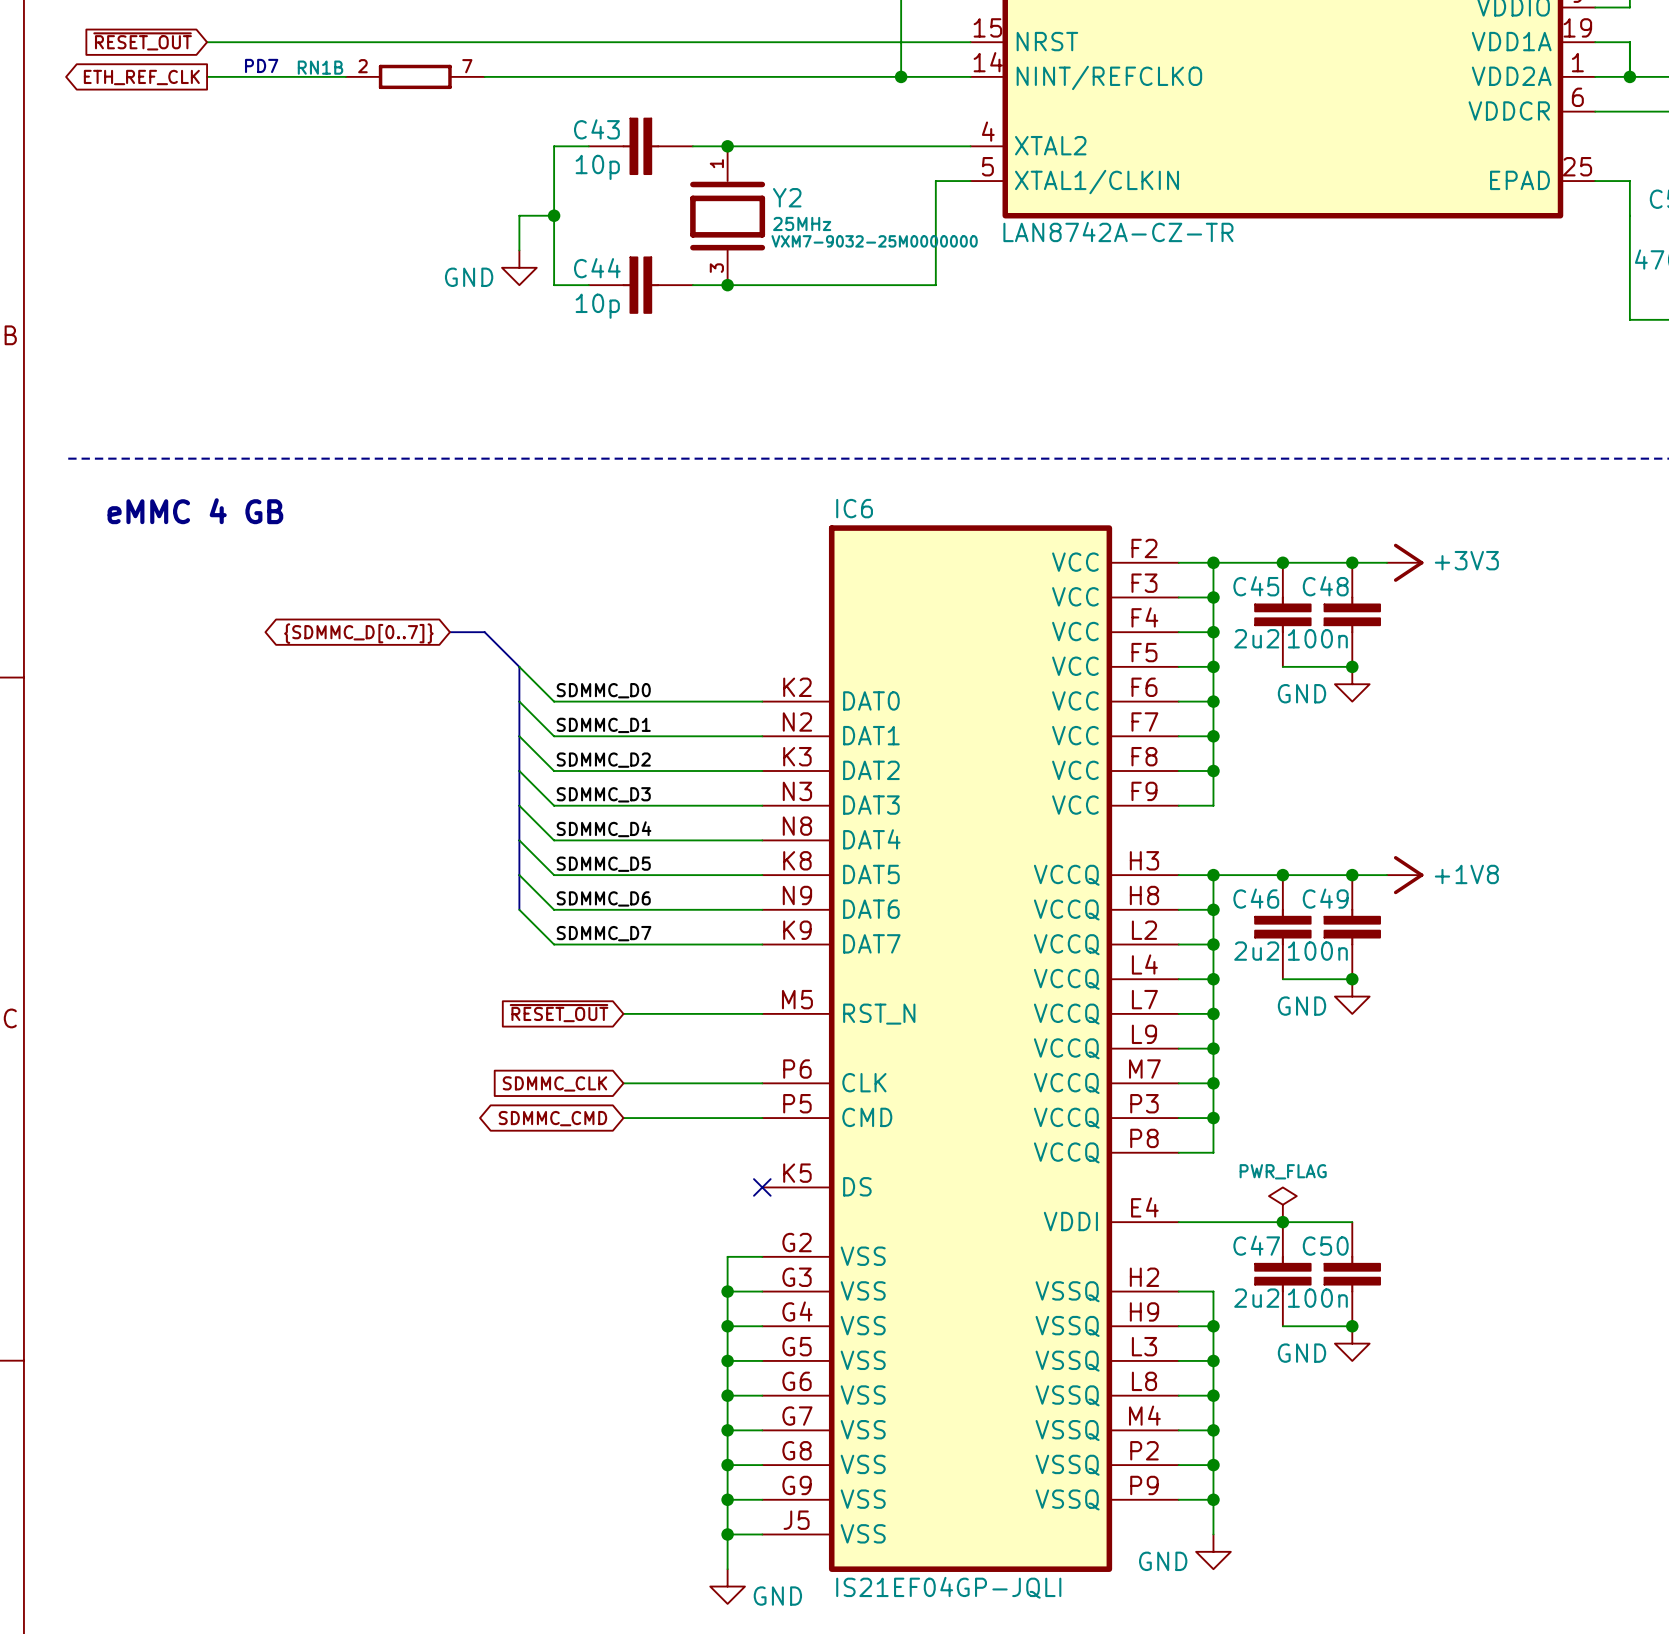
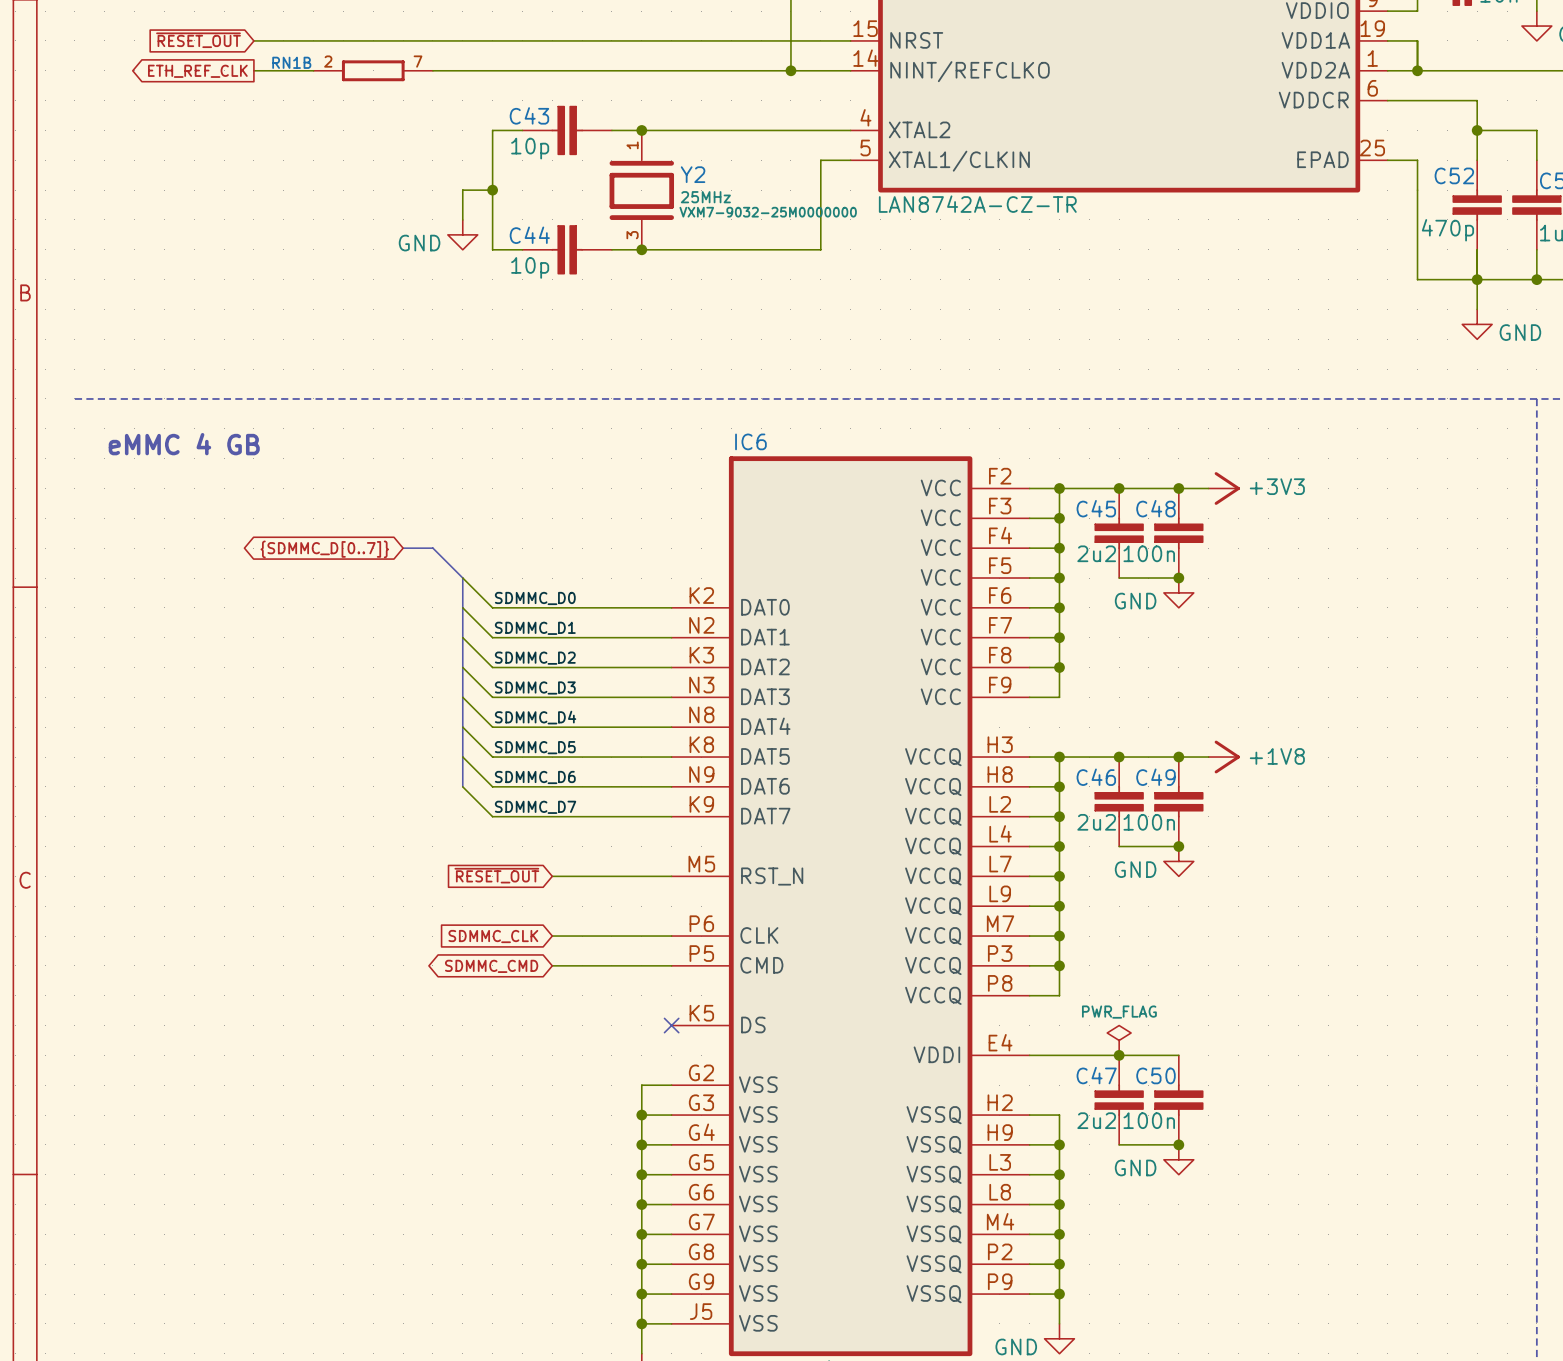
global label position: ~{RESET_OUT} (142, 41) -> ~{RESET_OUT} (198, 40)
wire: (207, 42) (276, 42) -> none
text: PD7 (261, 65) -> none
wire: (207, 76) (276, 76) -> none
global label position: ETH_REF_CLK (141, 77) -> ETH_REF_CLK (197, 71)

